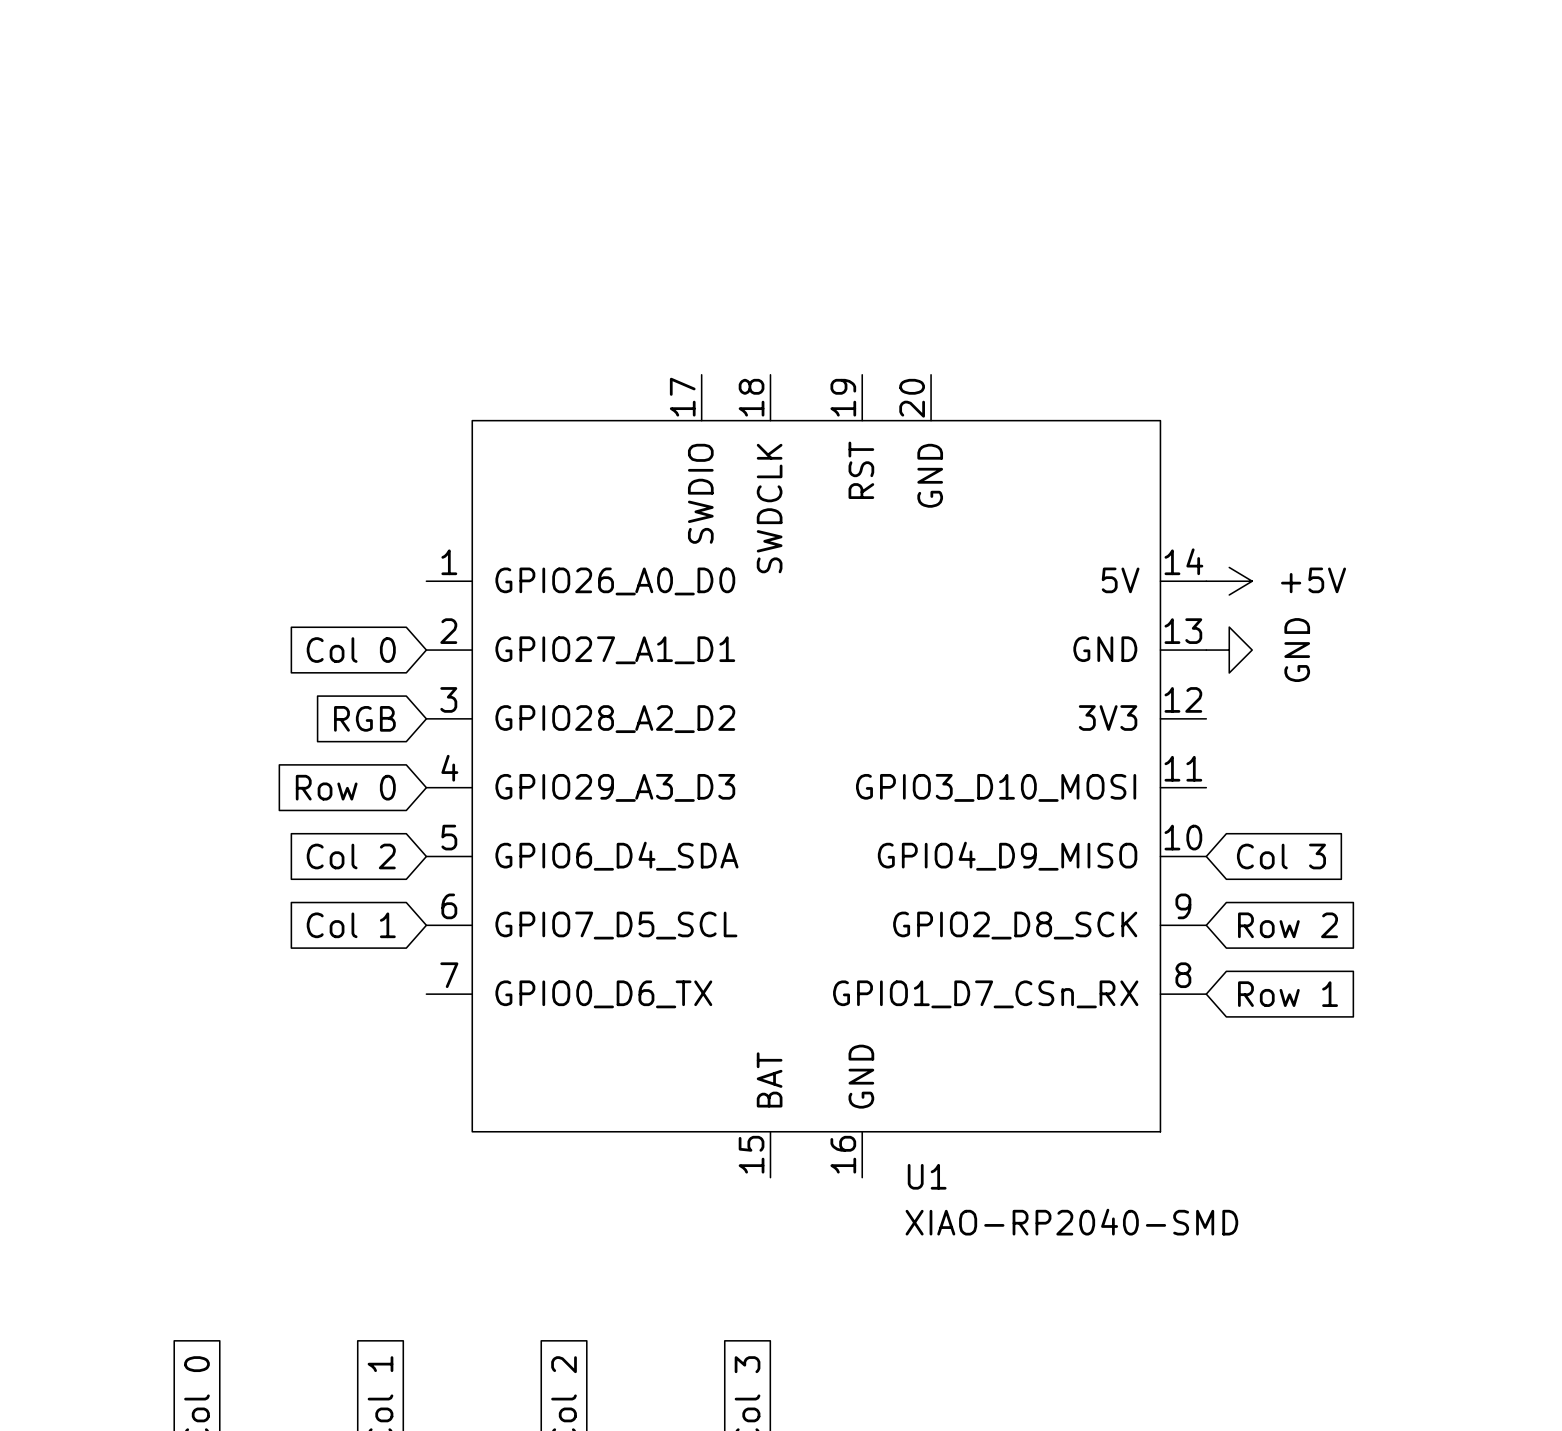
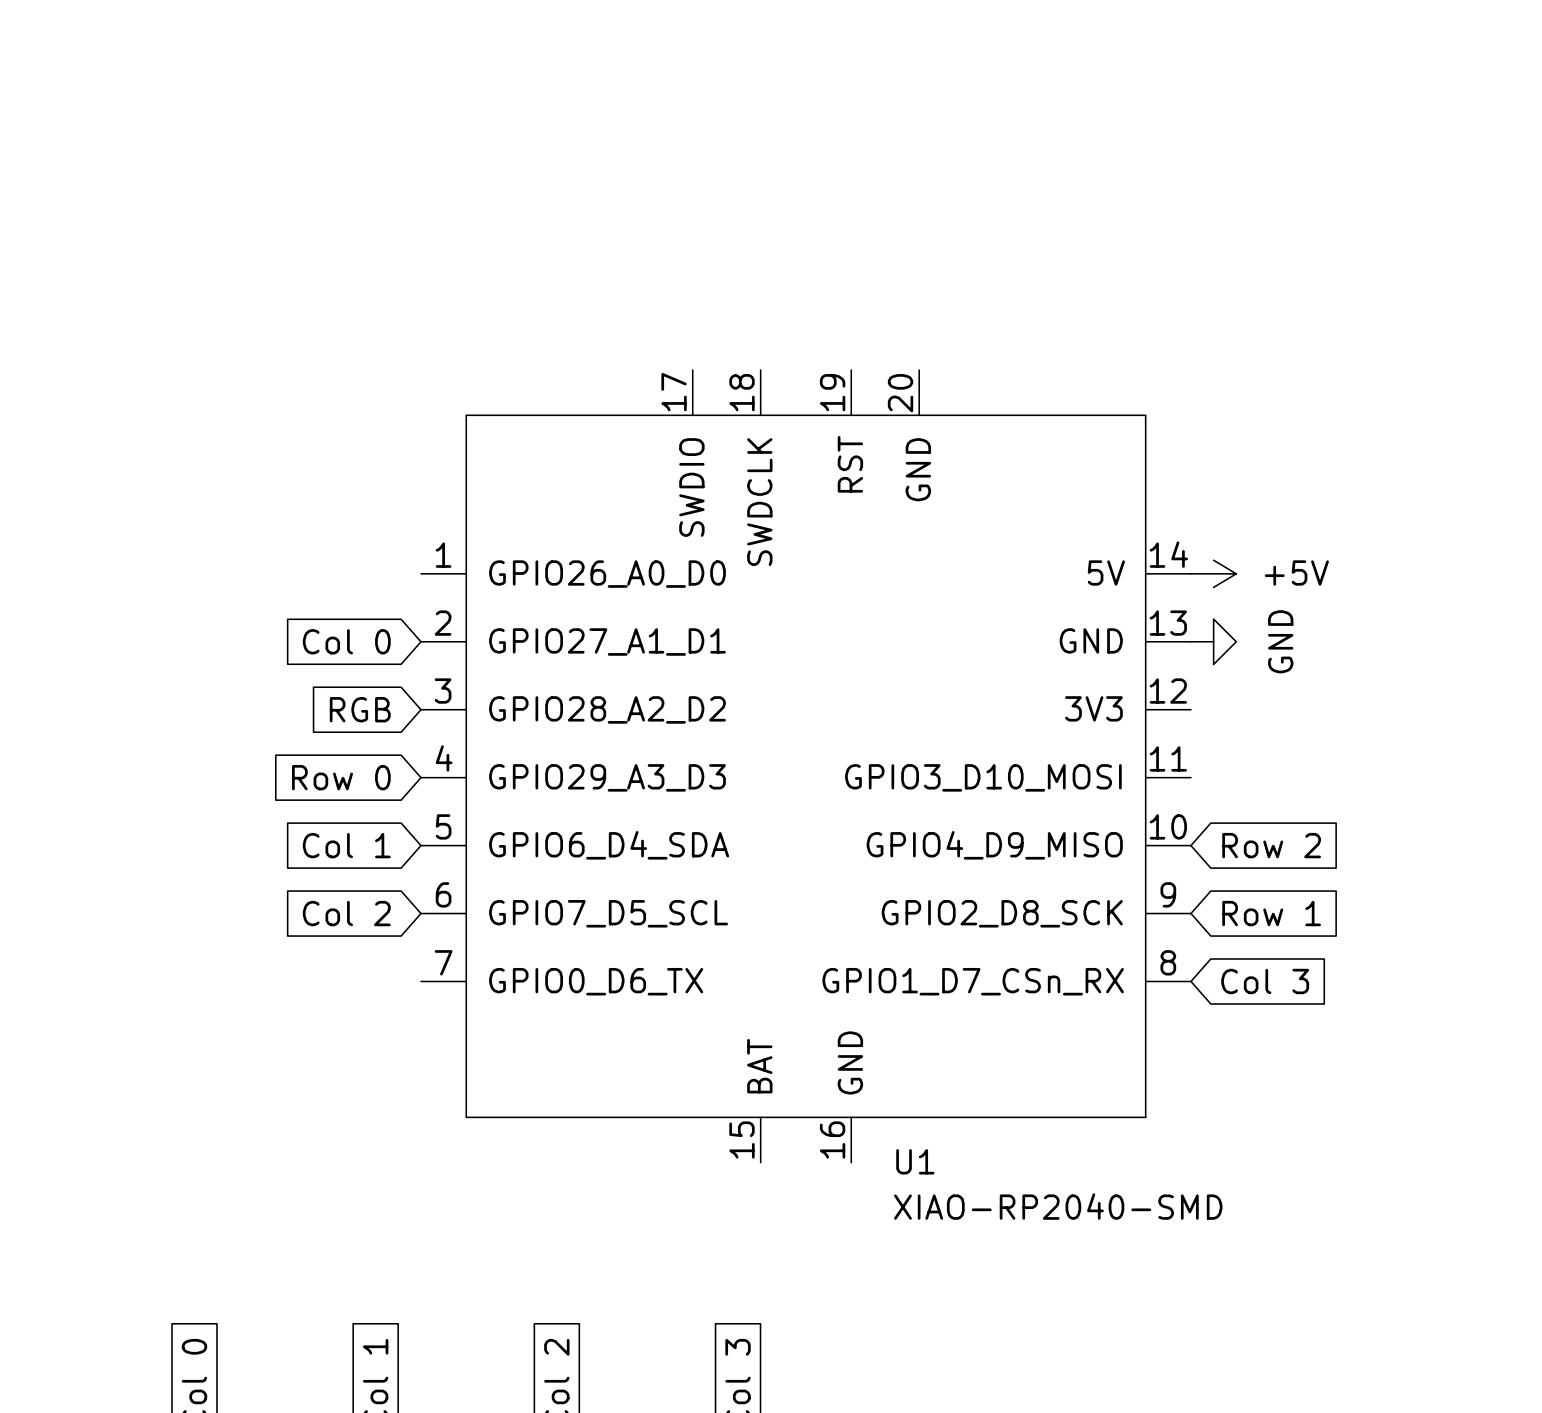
global label: Col 2 (351, 856) -> Col 1 (346, 845)
global label: Col 3 (1281, 856) -> Row 2 (1271, 845)
global label: Col 1 (351, 925) -> Col 2 (346, 913)
global label: Row 2 (1288, 925) -> Row 1 (1271, 913)
global label: Row 1 (1288, 994) -> Col 3 (1265, 981)

